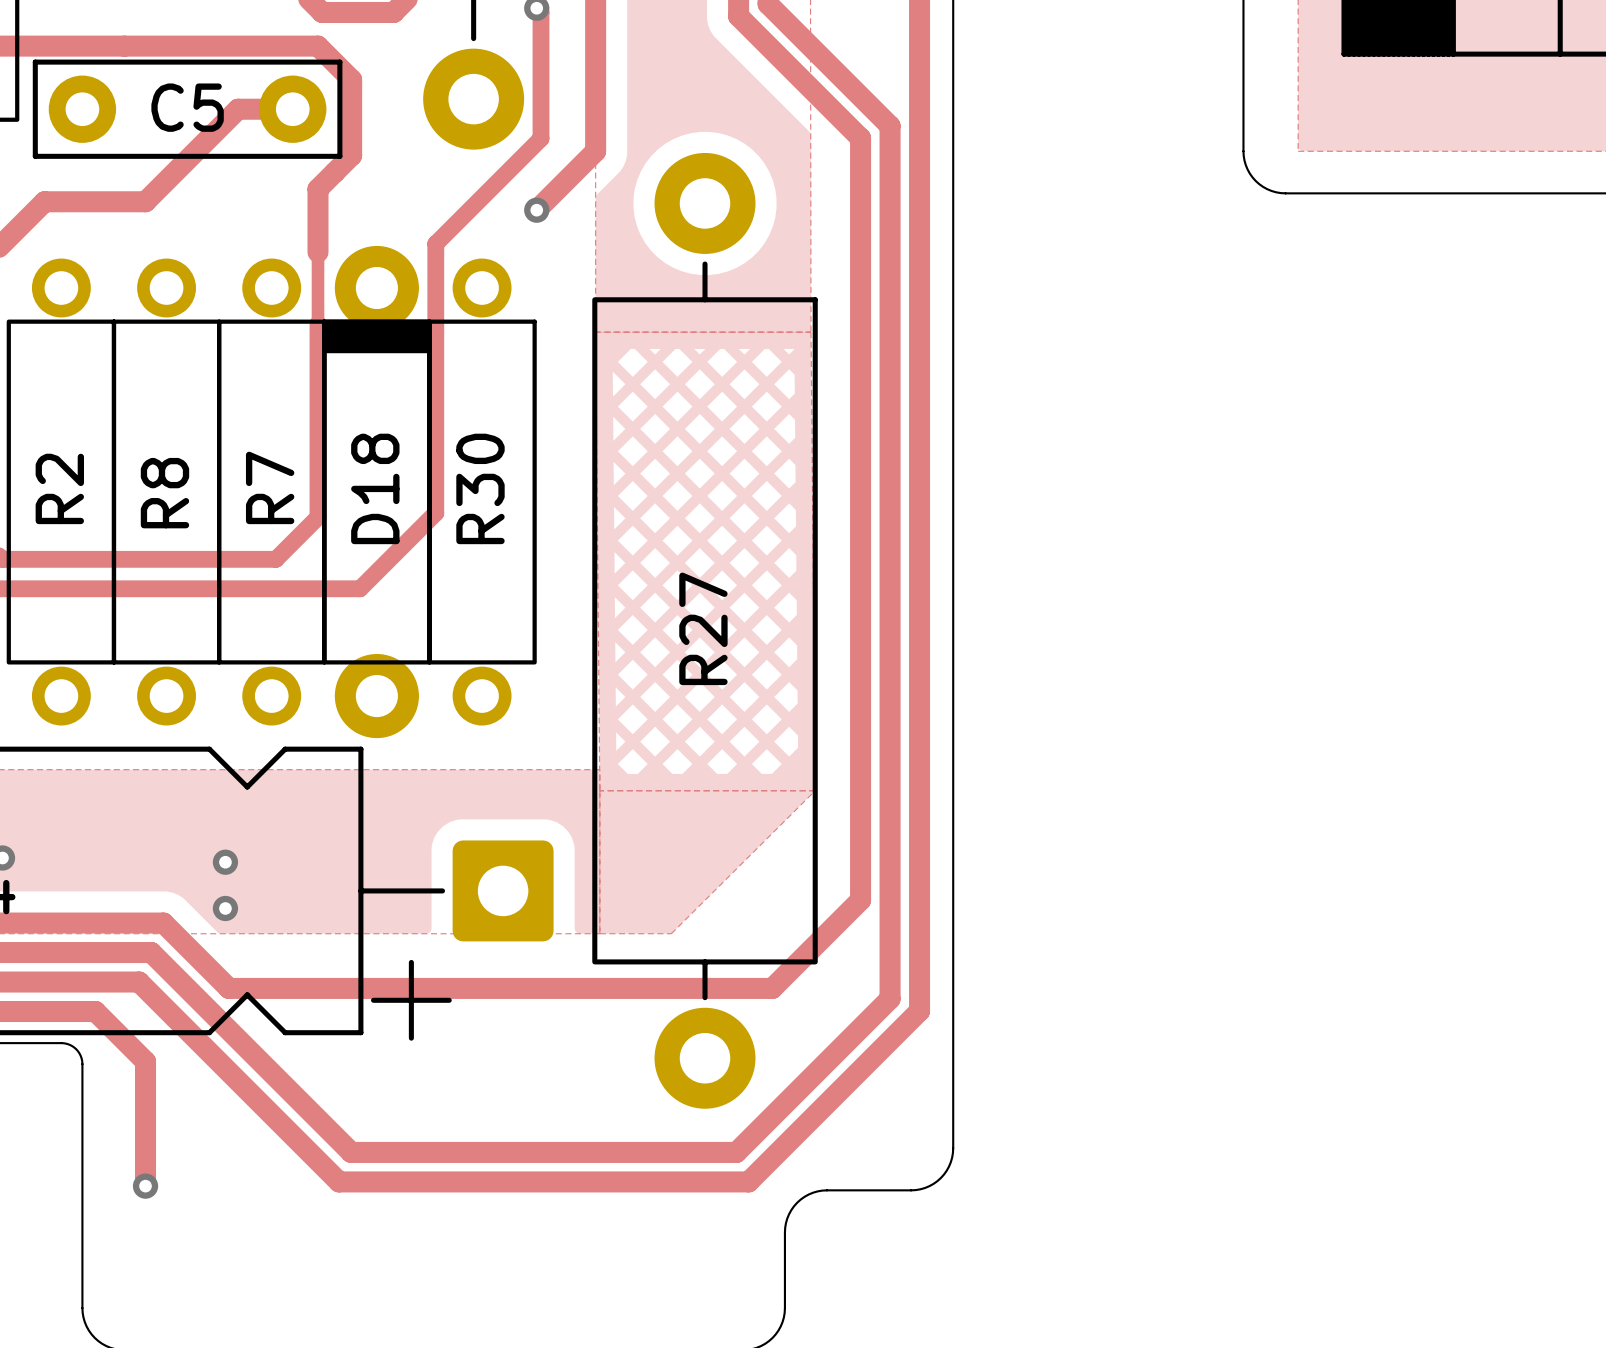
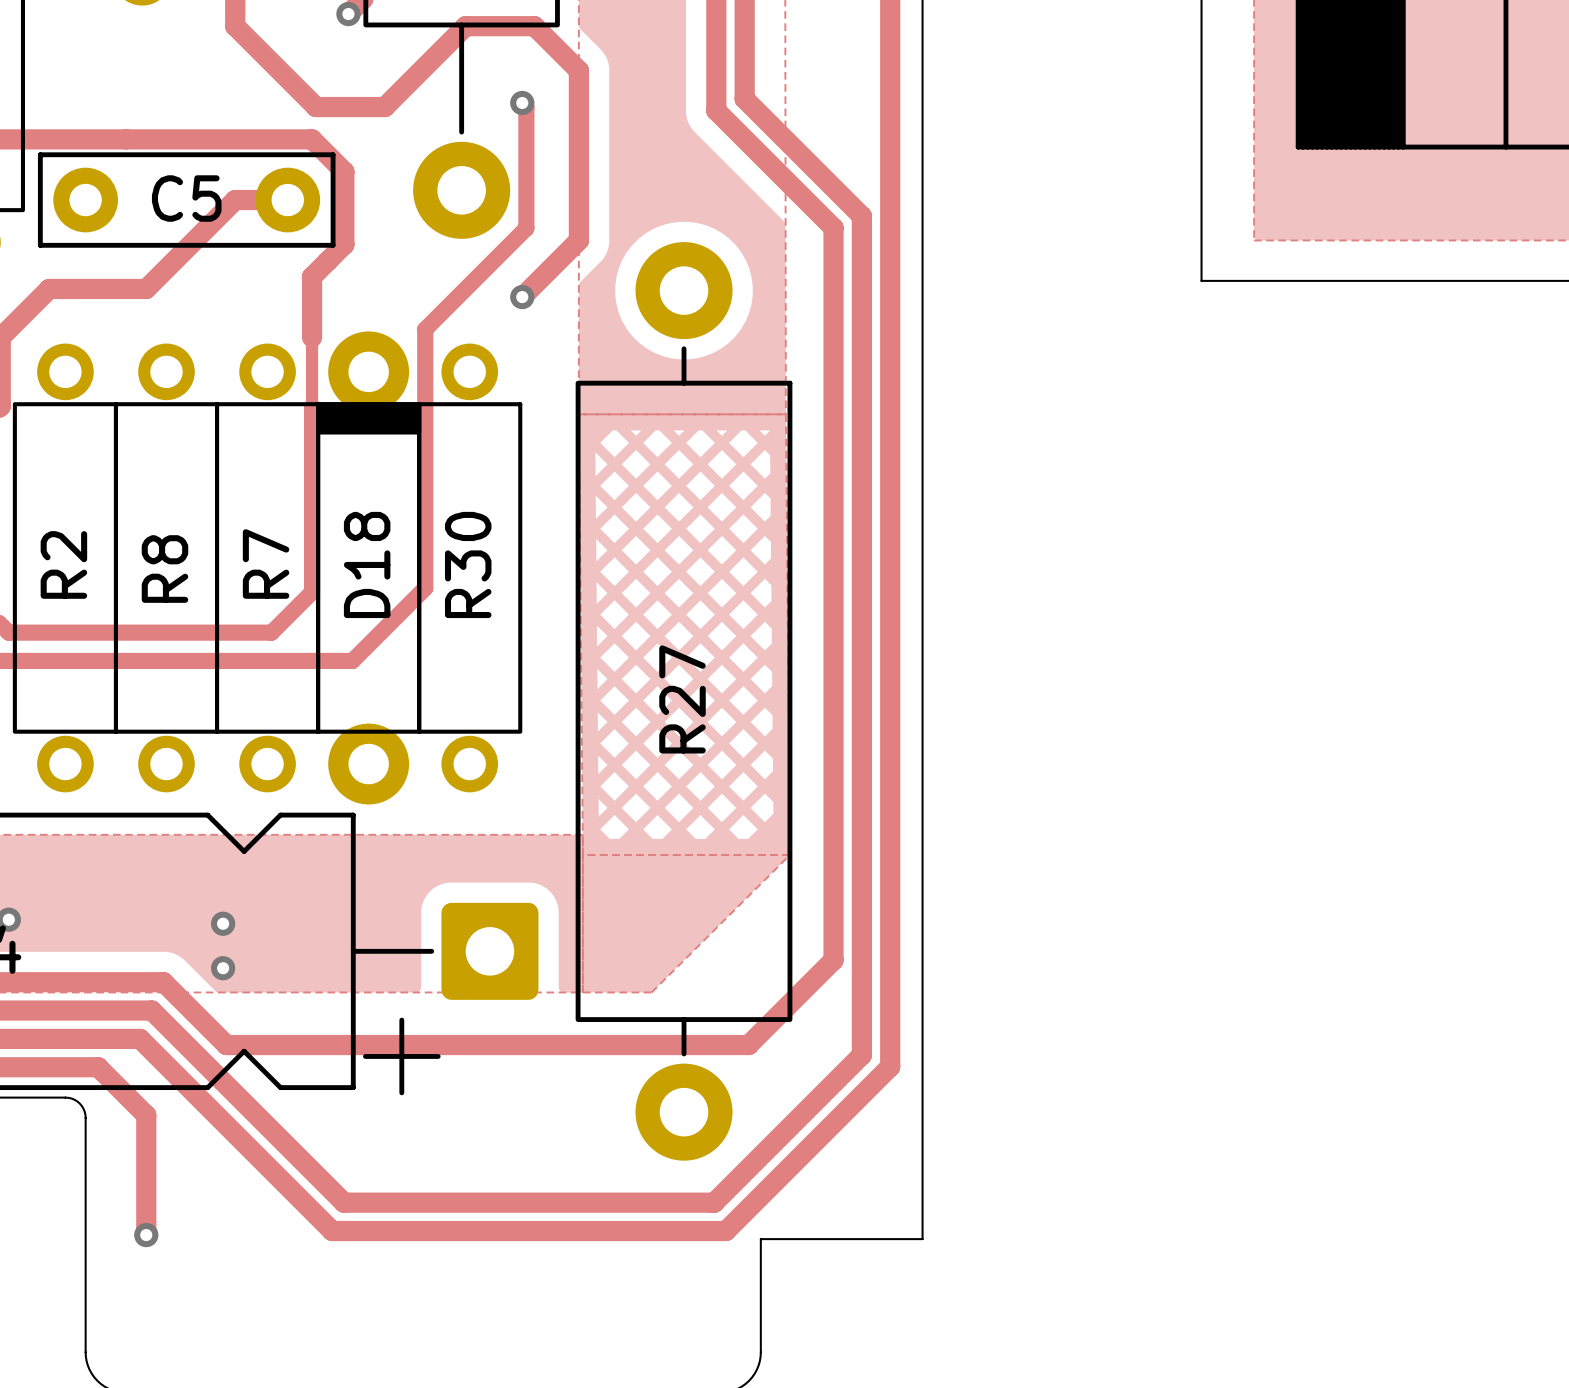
board edge: (1243, 151) (1247, 169) (1255, 181) (1267, 189) (1285, 193) -> (1201, 240) (1201, 280) (1241, 280)
board edge: (953, 1148) (949, 1166) (940, 1178) (925, 1187) (911, 1190) -> (922, 1198) (922, 1239) (882, 1239)
board edge: (827, 1190) (813, 1192) (797, 1202) (789, 1214) (784, 1232) -> (801, 1239) (760, 1239) (760, 1279)

